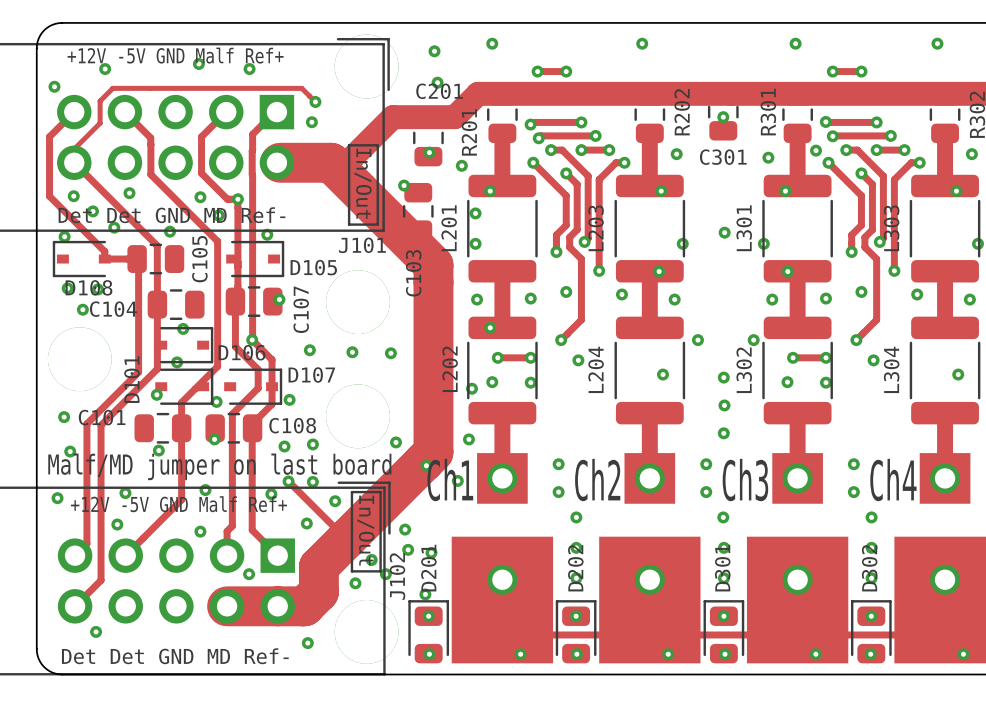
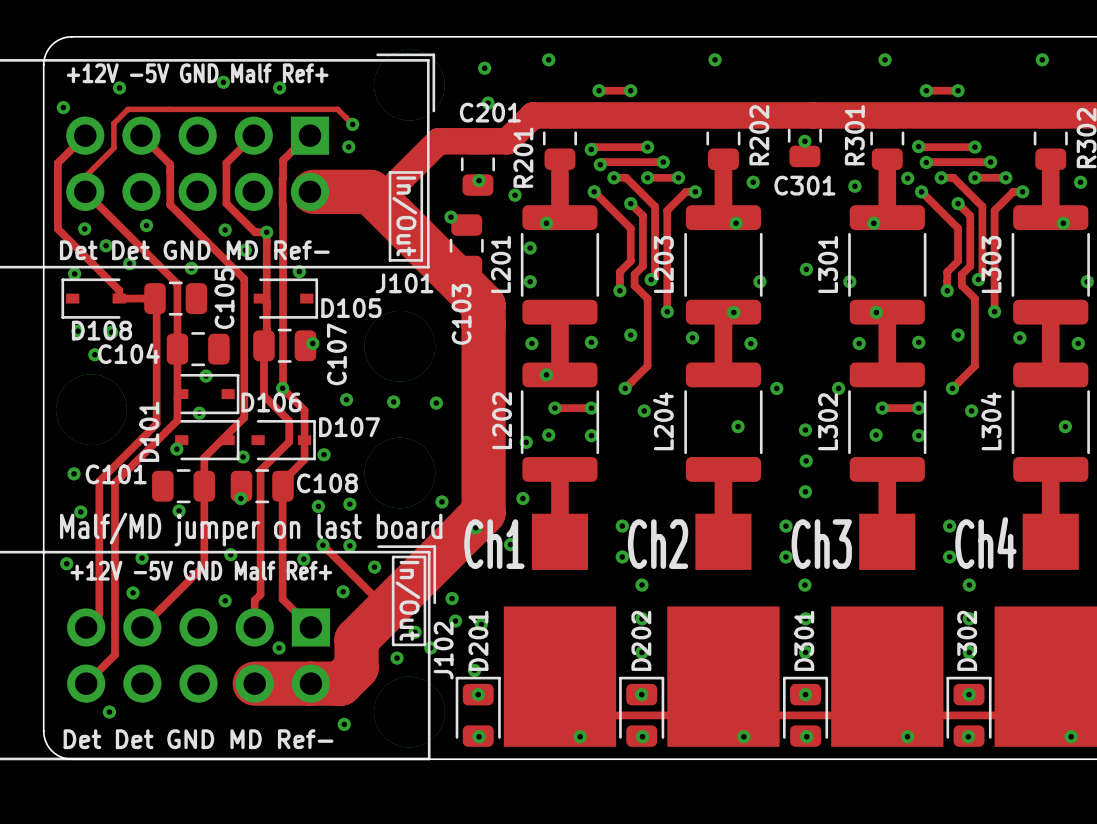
via: (502, 478) -> none
via: (649, 478) -> none
via: (797, 478) -> none
via: (945, 478) -> none
via: (502, 579) -> none
via: (649, 579) -> none
via: (797, 579) -> none
via: (945, 579) -> none

